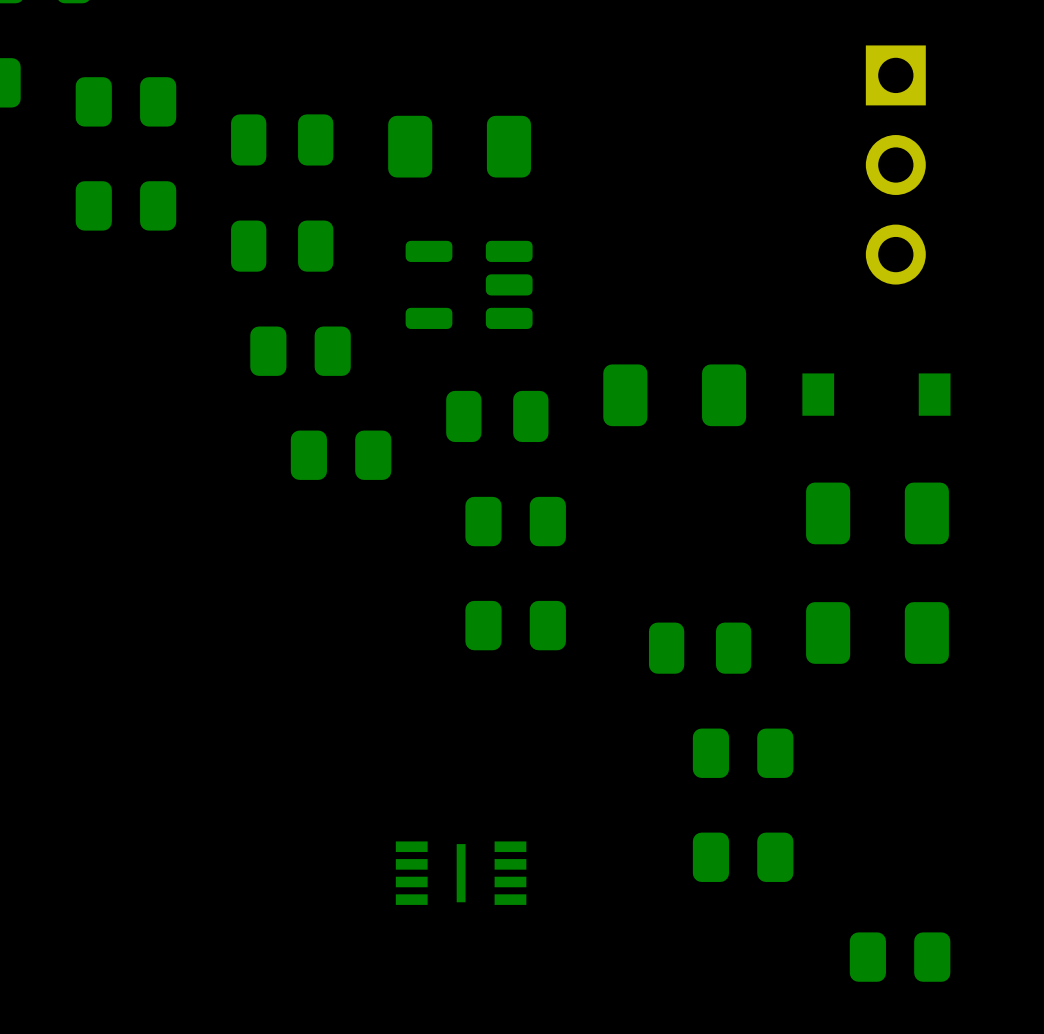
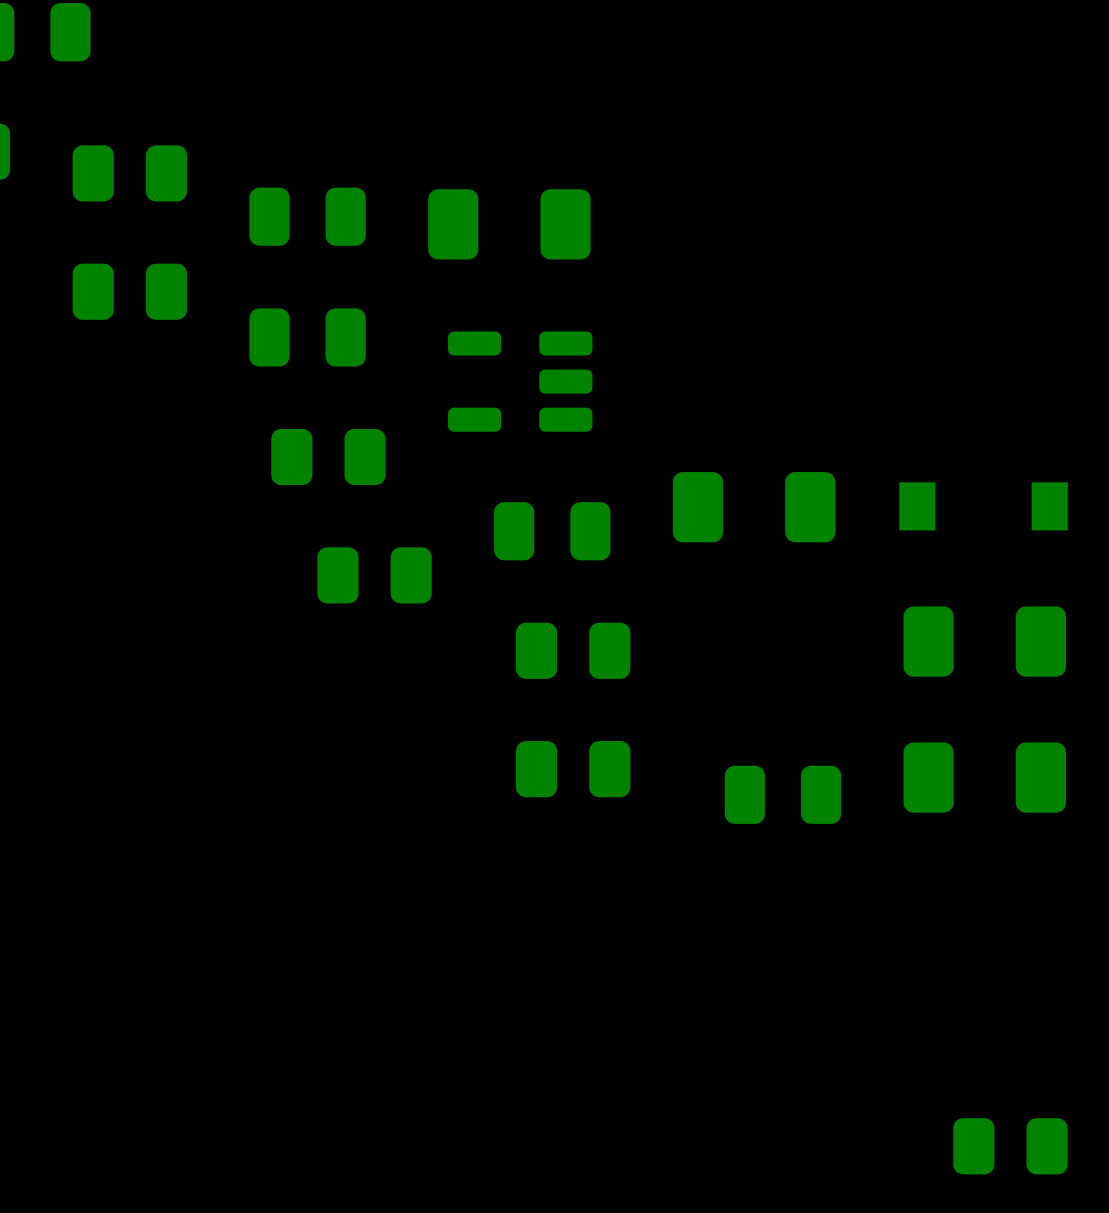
part: (895, 165) -> none
part: (743, 753) -> none
part: (743, 857) -> none
part: (461, 873) -> none

